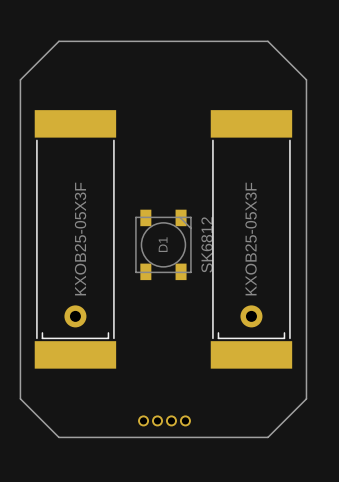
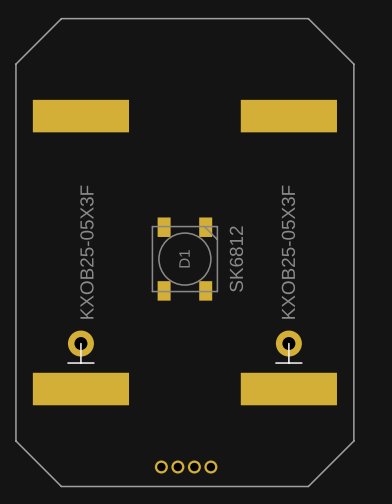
part footprint: [34, 110, 117, 369] -> [32, 99, 130, 406]
part footprint: [210, 110, 293, 369] -> [240, 99, 337, 406]

